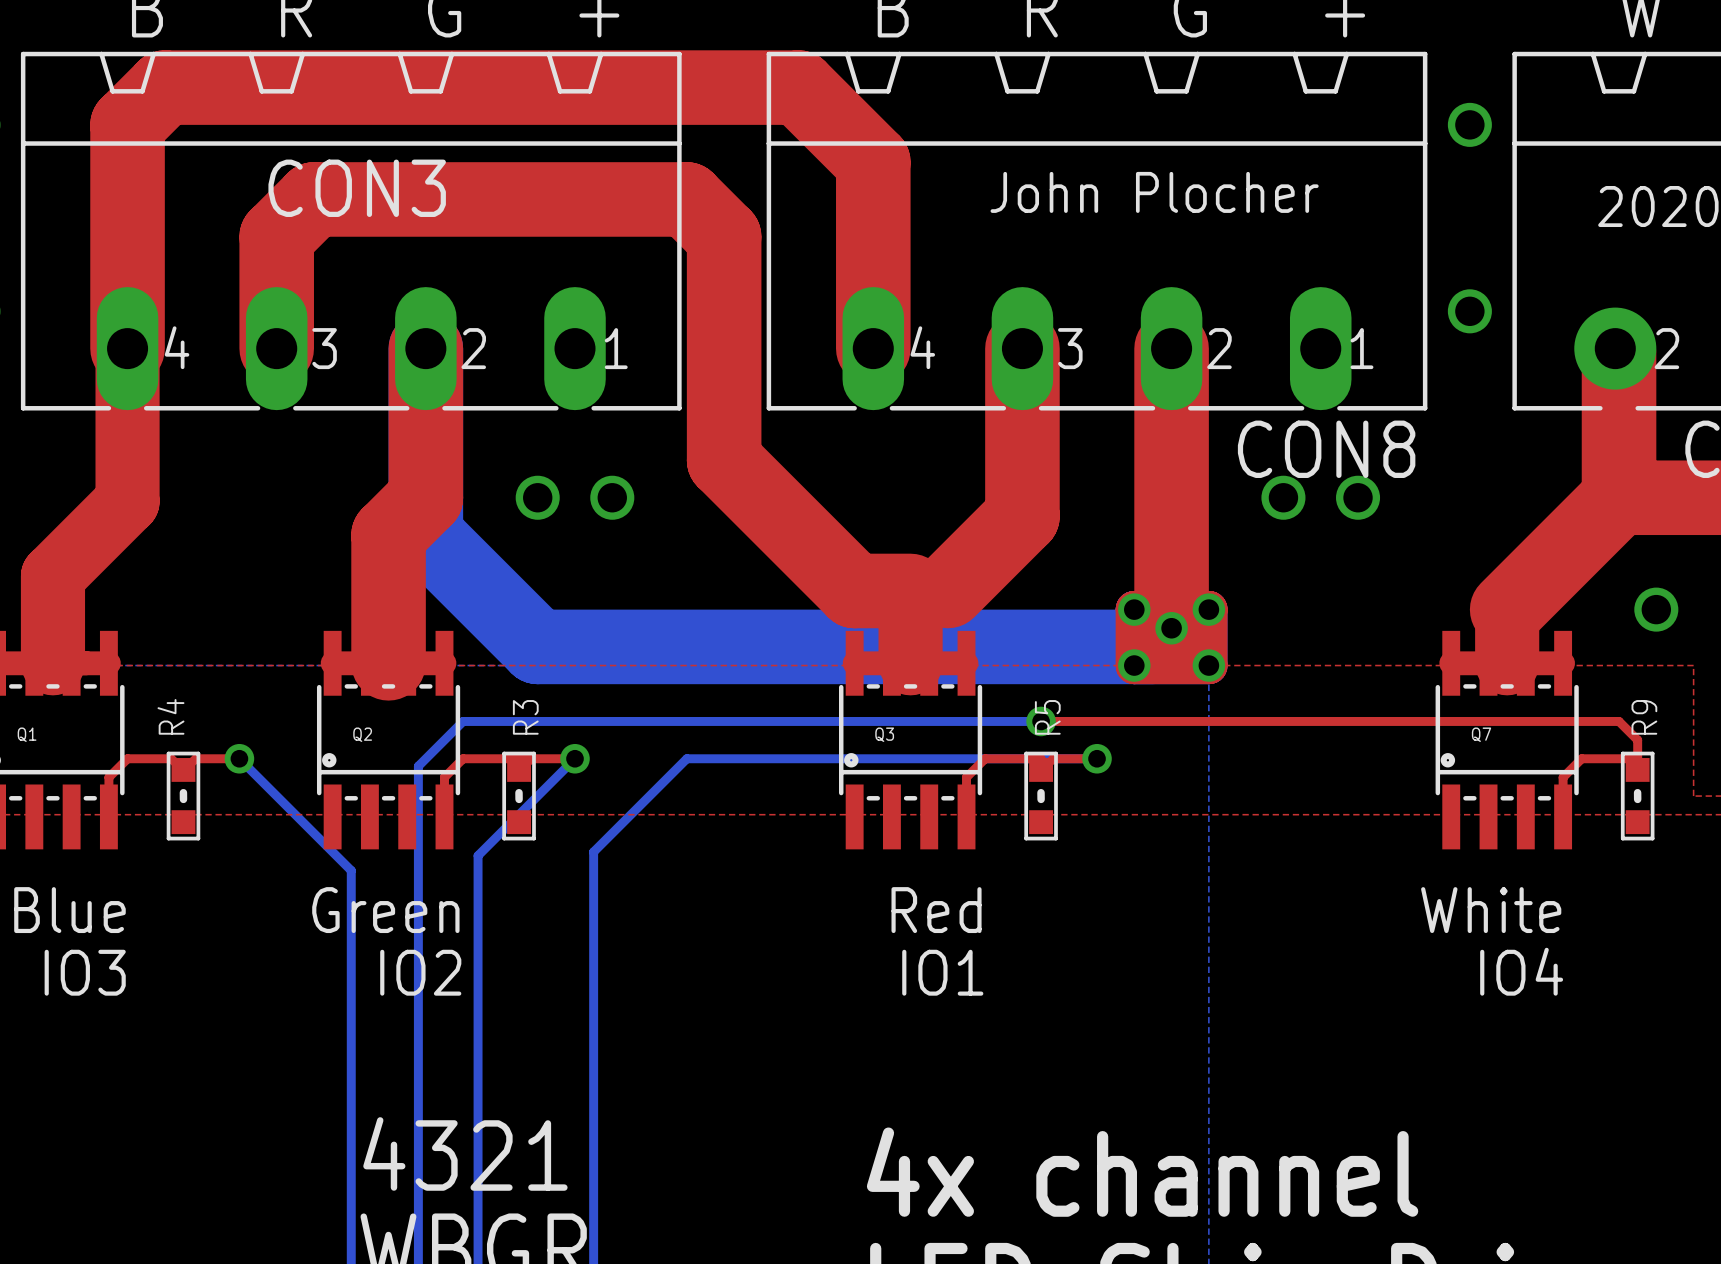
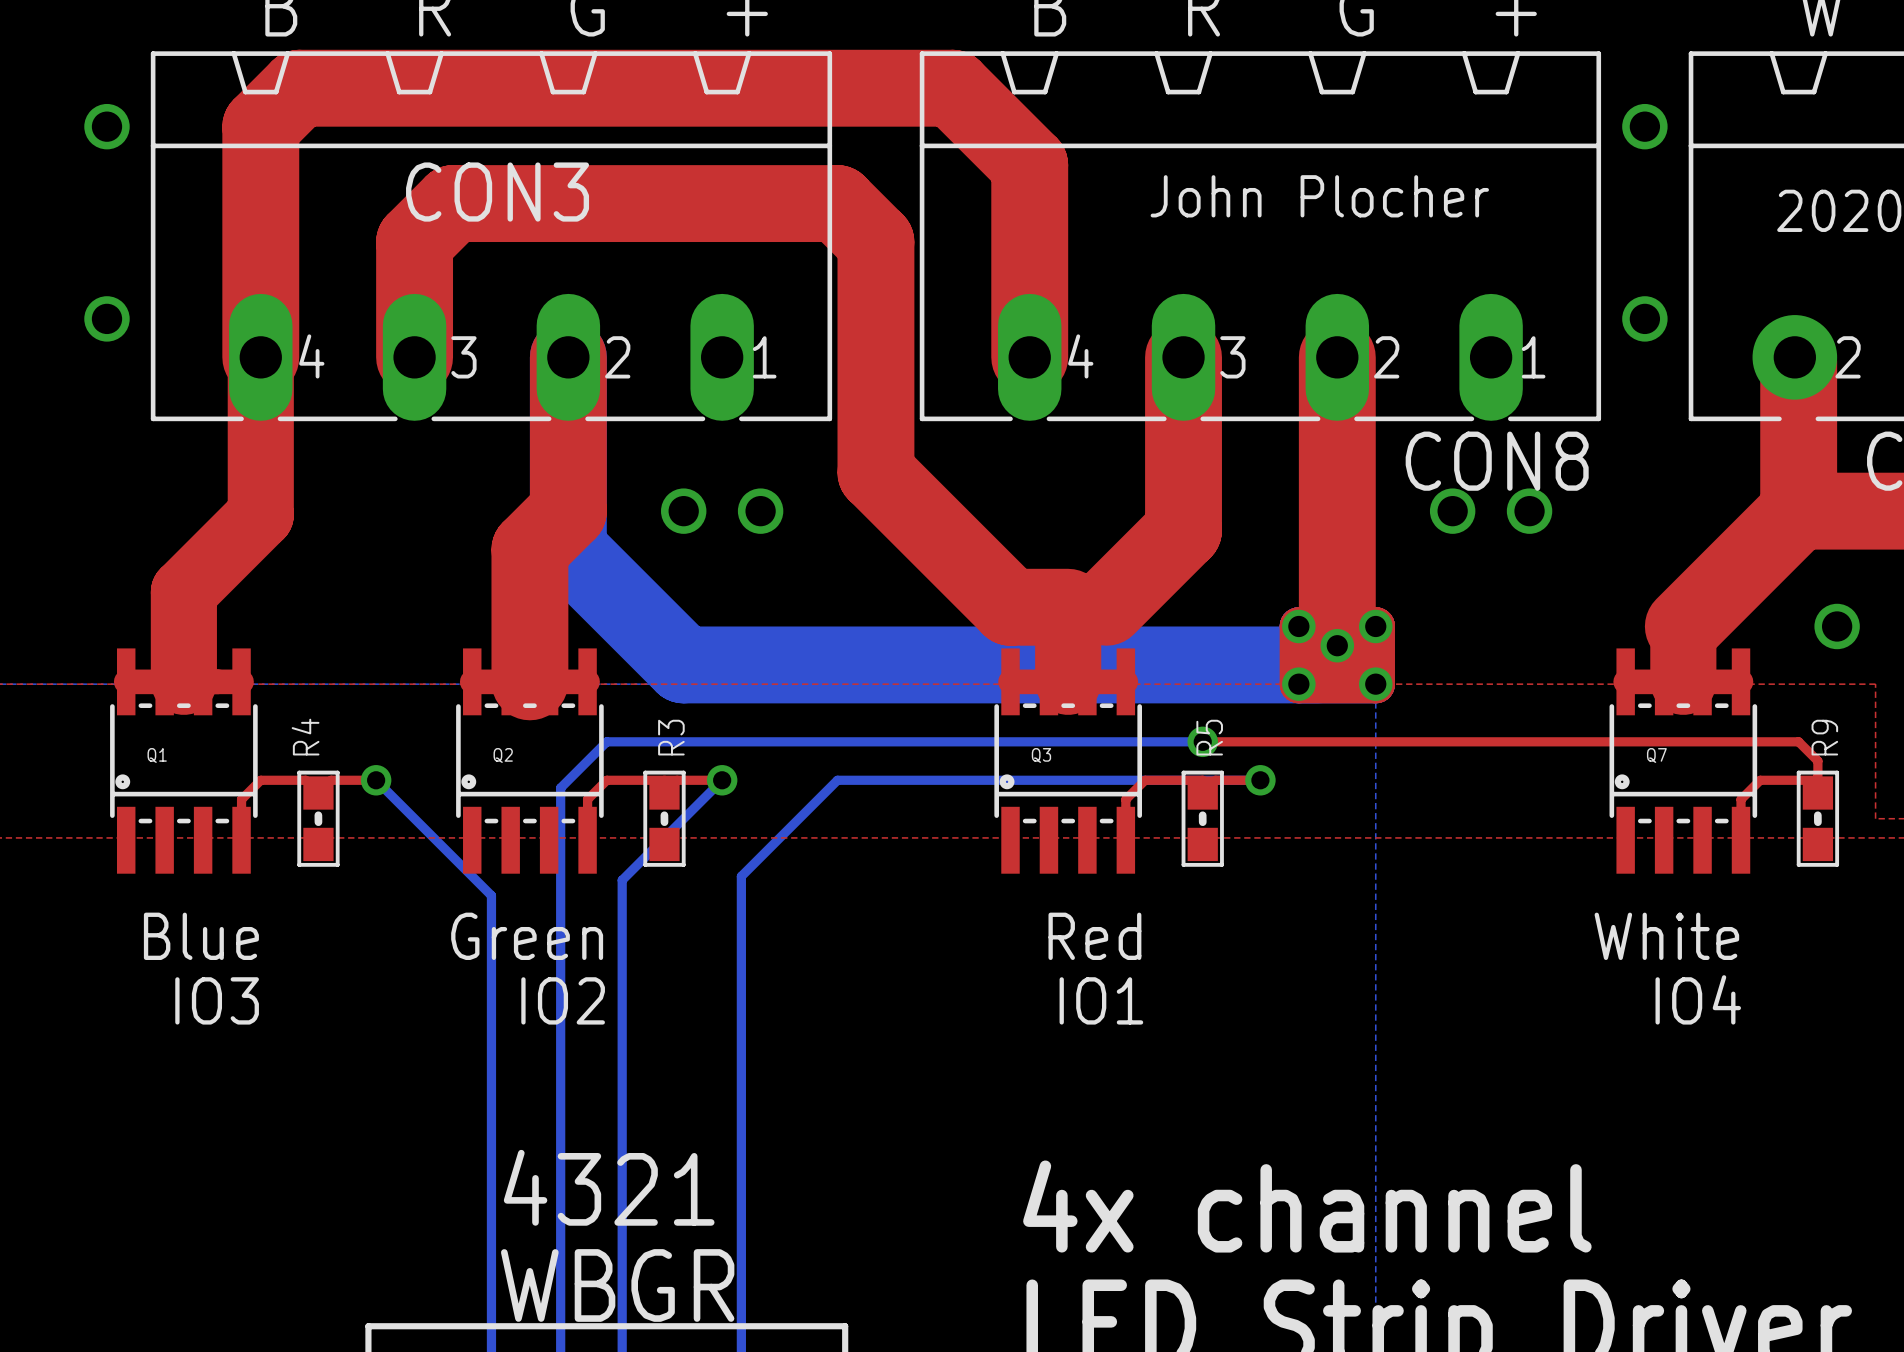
R4 footprint: [166, 751, 201, 841] -> [297, 770, 340, 867]
R3 footprint: [502, 751, 536, 841] -> [643, 770, 686, 867]
R5 footprint: [1024, 751, 1058, 841] -> [1181, 770, 1224, 867]
R9 footprint: [1620, 751, 1655, 841] -> [1796, 770, 1840, 867]

